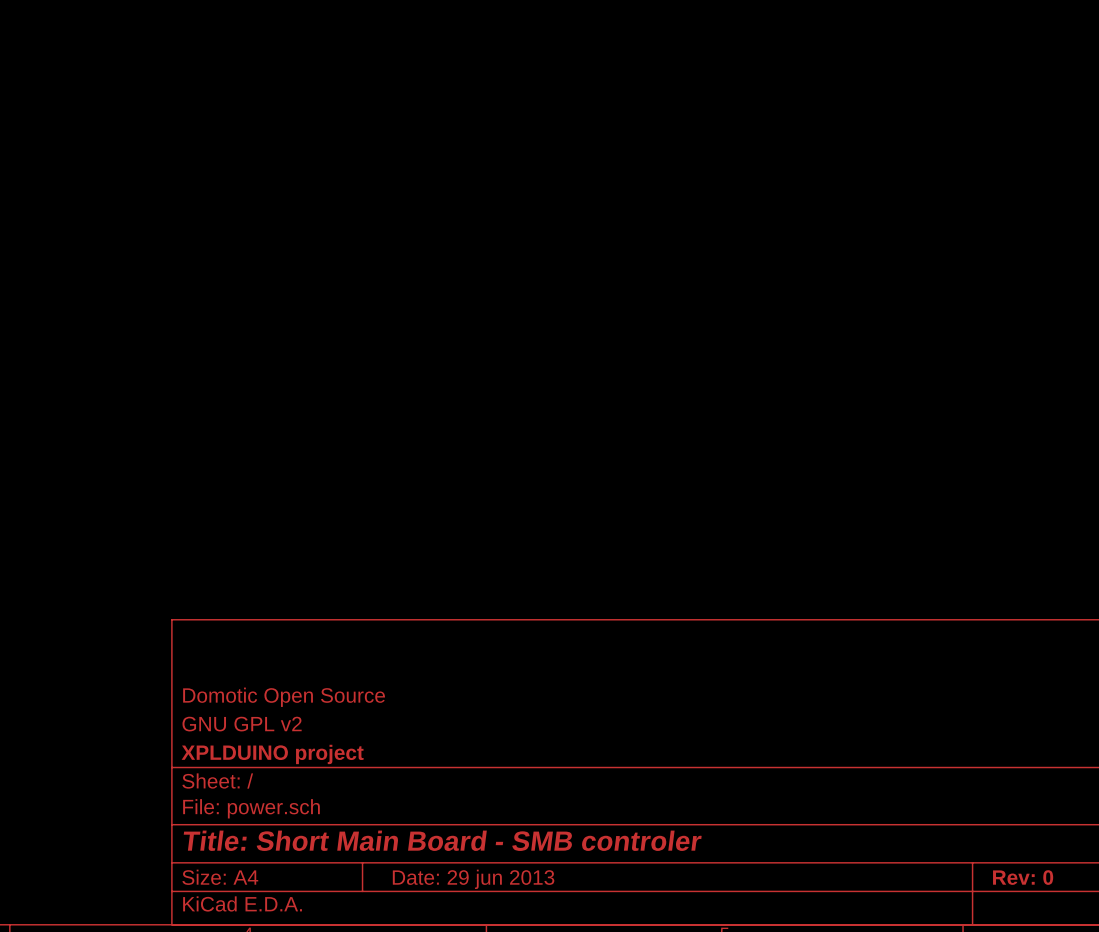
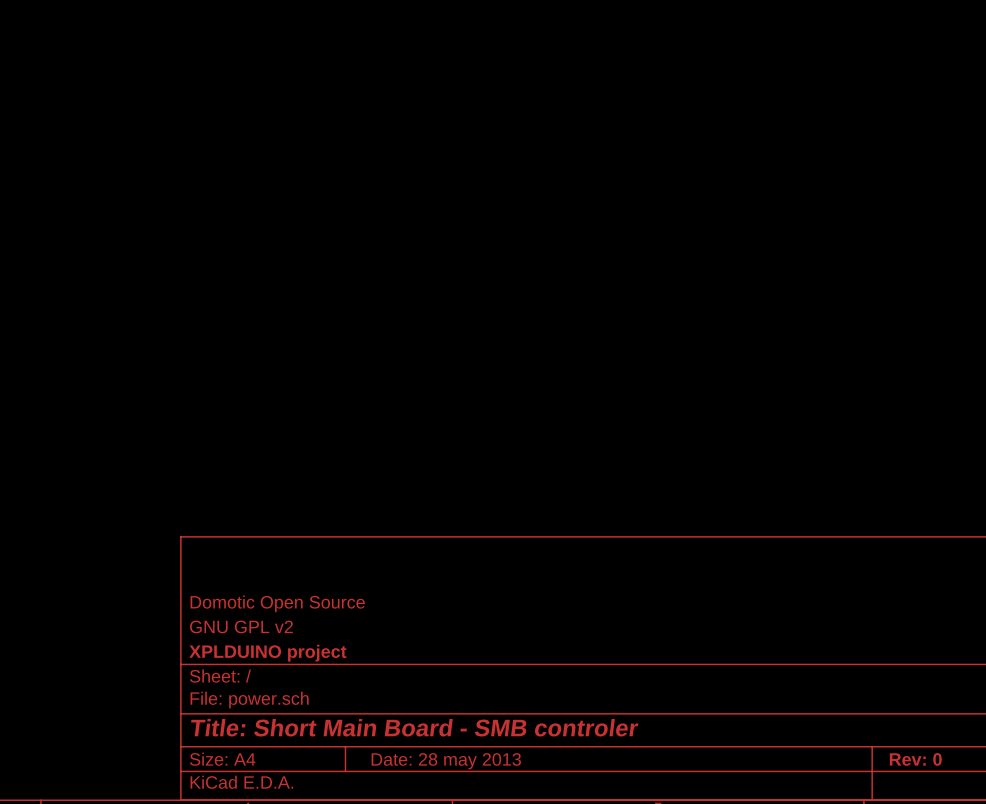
title block: Date: 29 jun 2013 (473, 879) -> Date: 28 may 2013 (446, 761)

